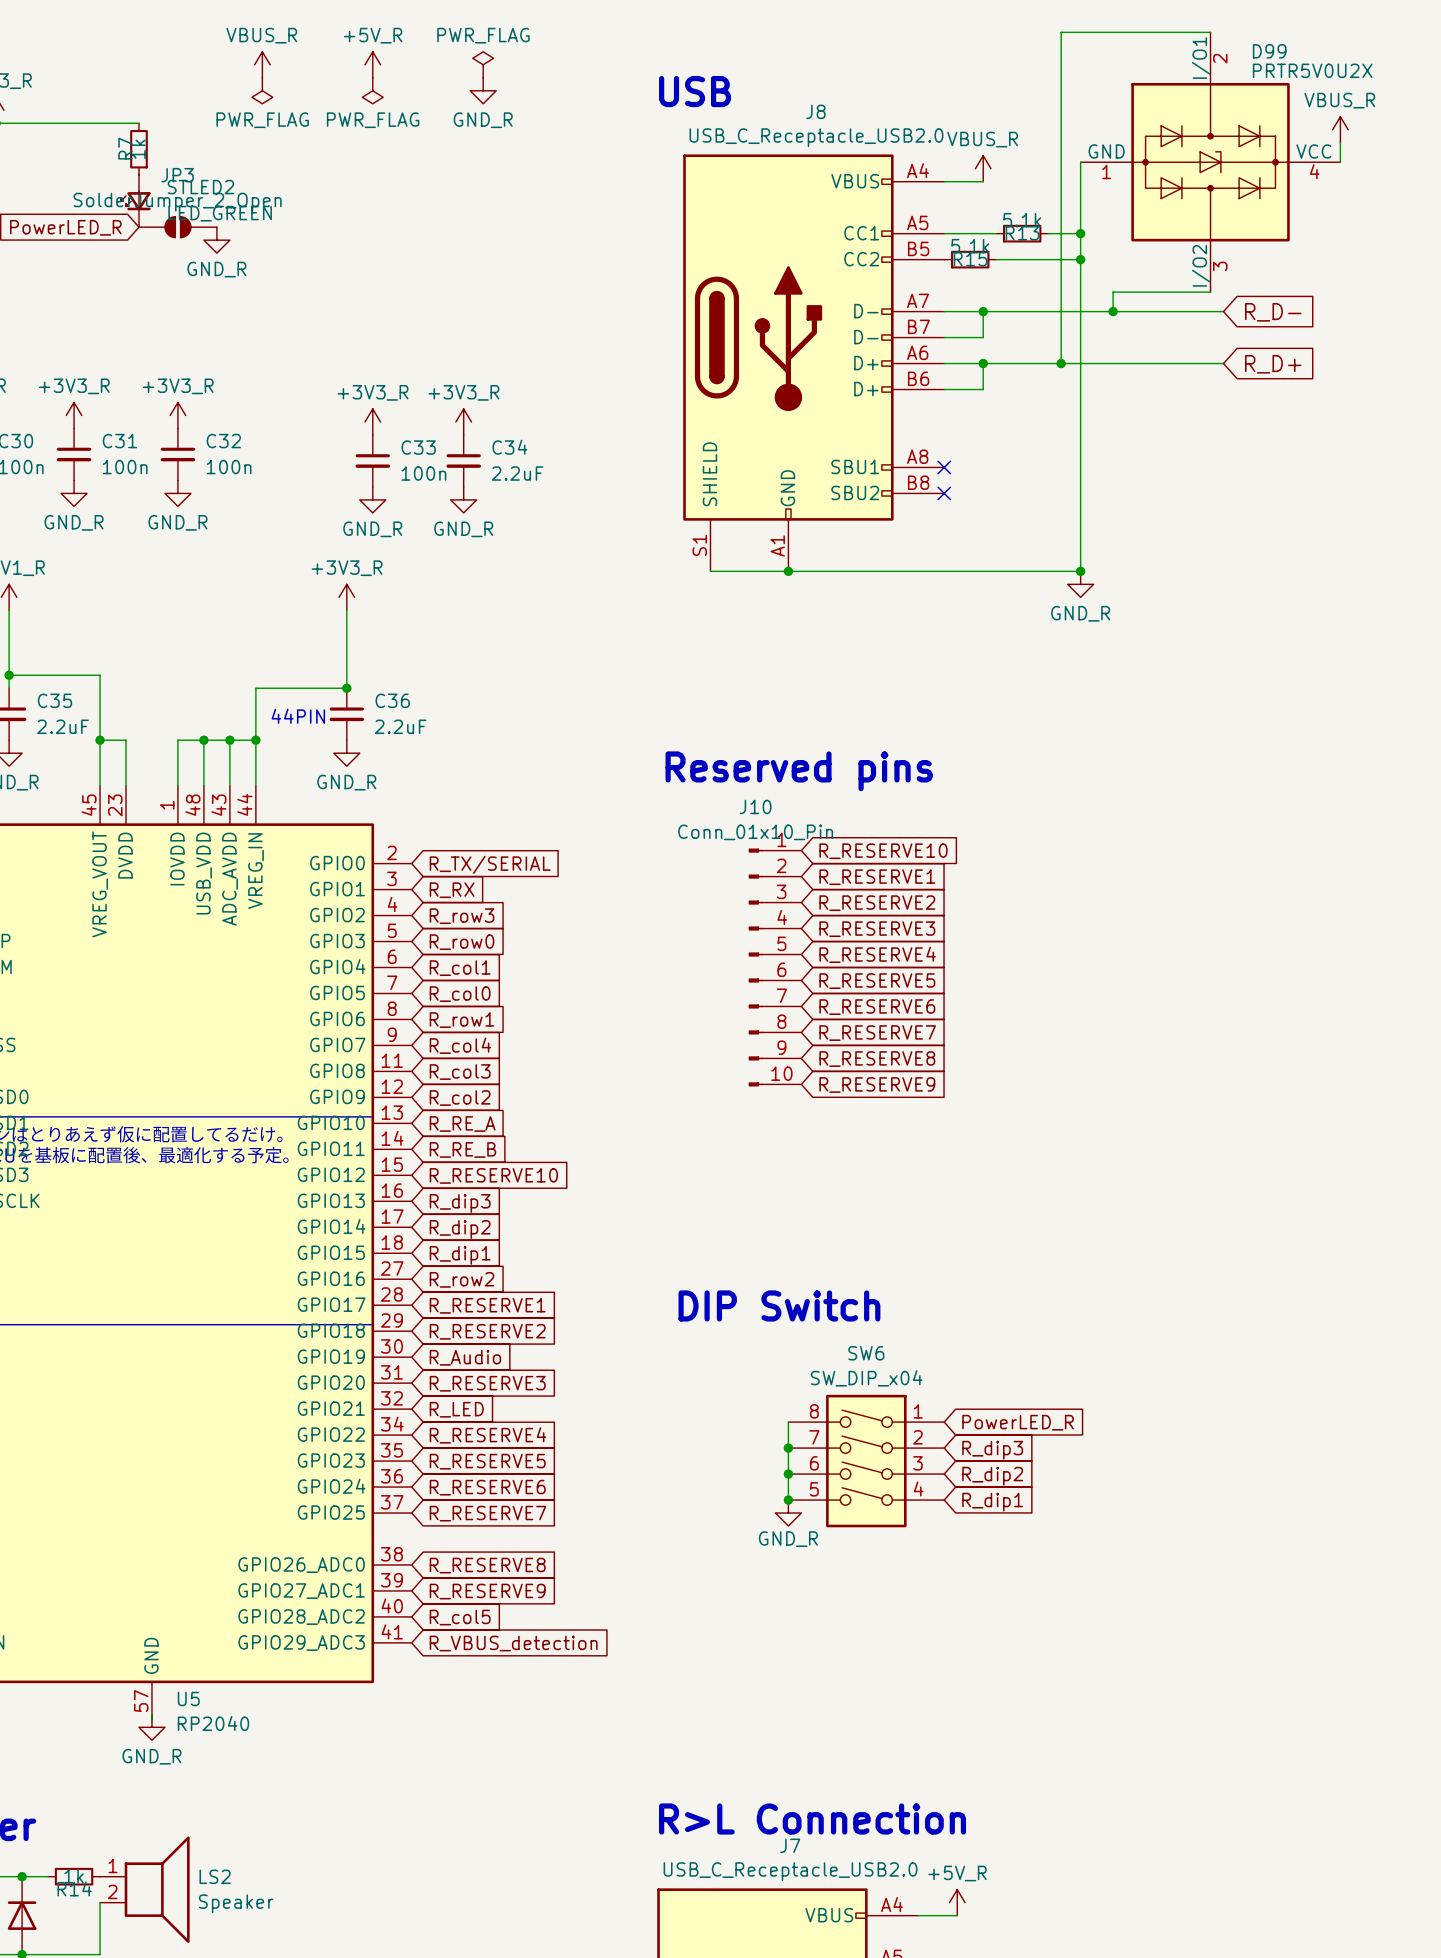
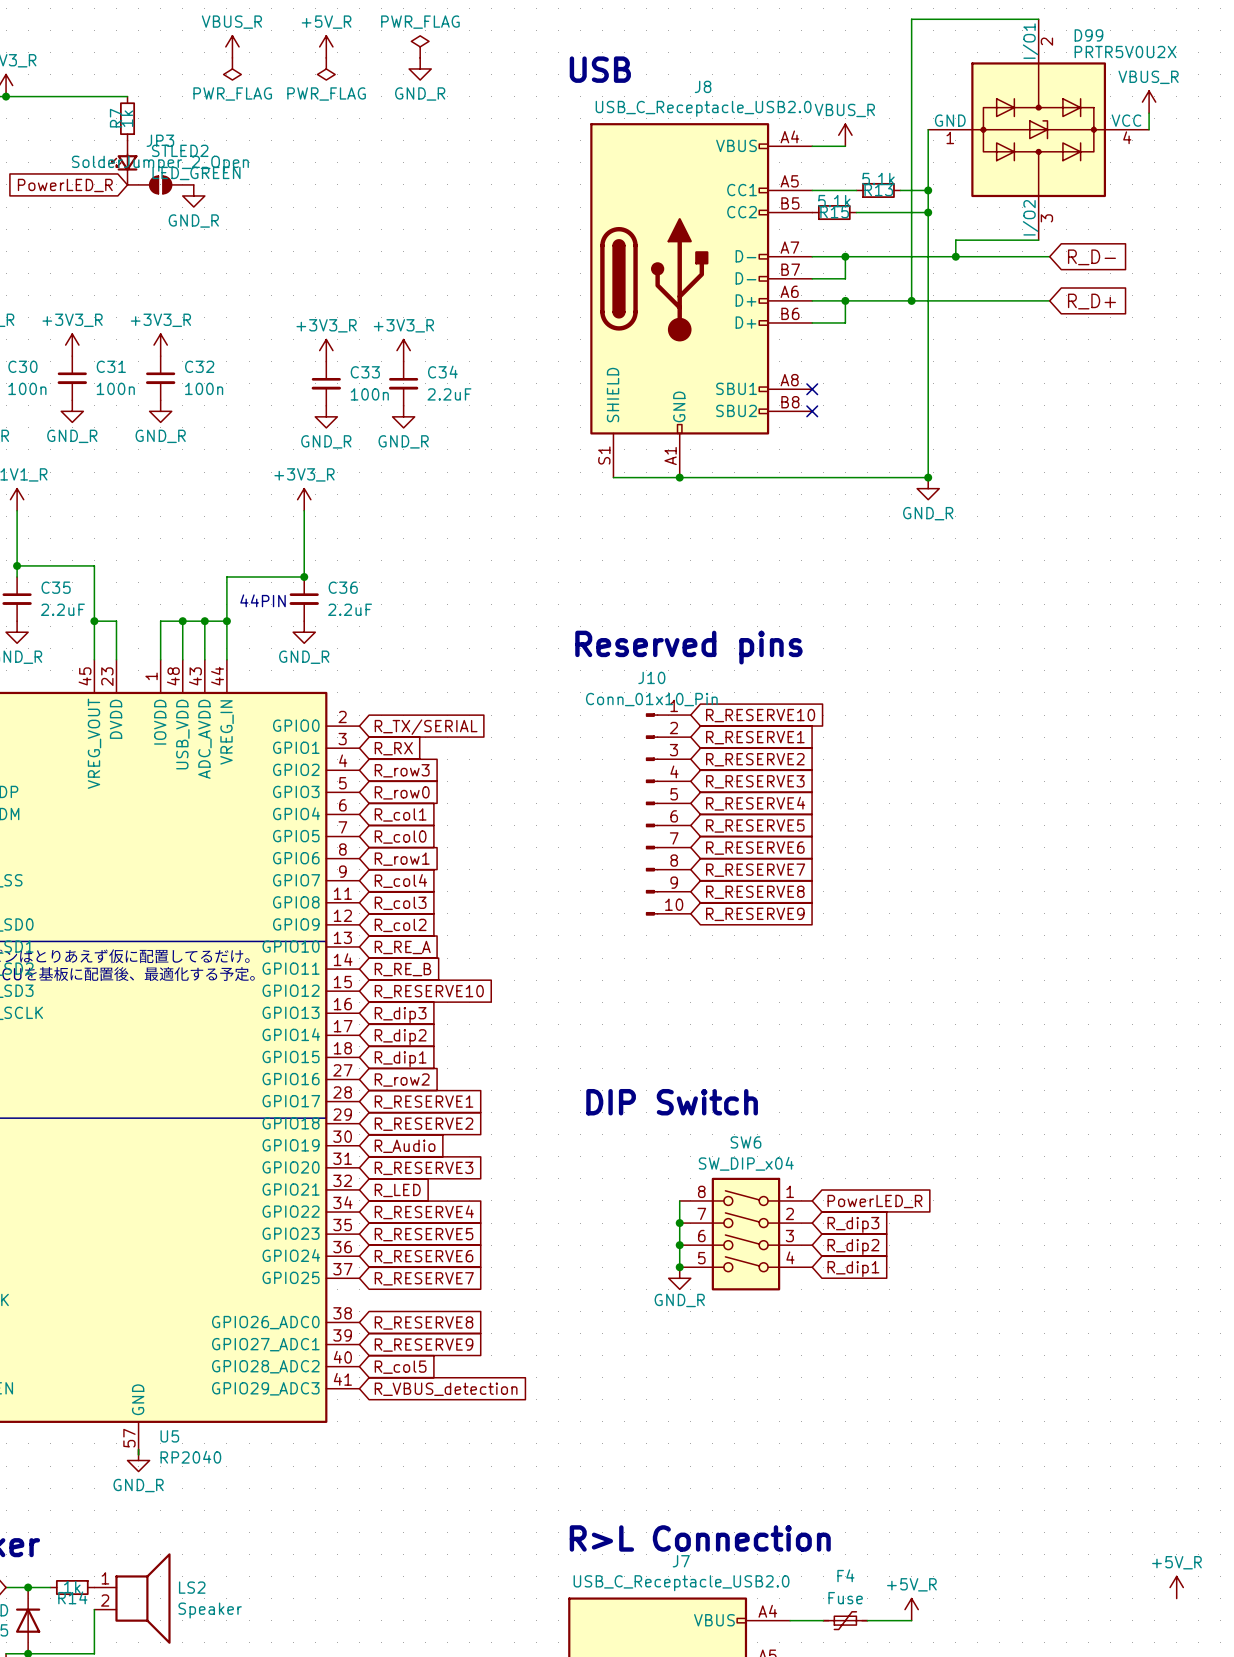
power symbol: none -> +5V_R (1176, 1587)
power symbol position: +5V_R (957, 1902) -> +5V_R (911, 1609)
F4: none -> Fuse (845, 1620)
wire: none -> (867, 1620) (911, 1620)

